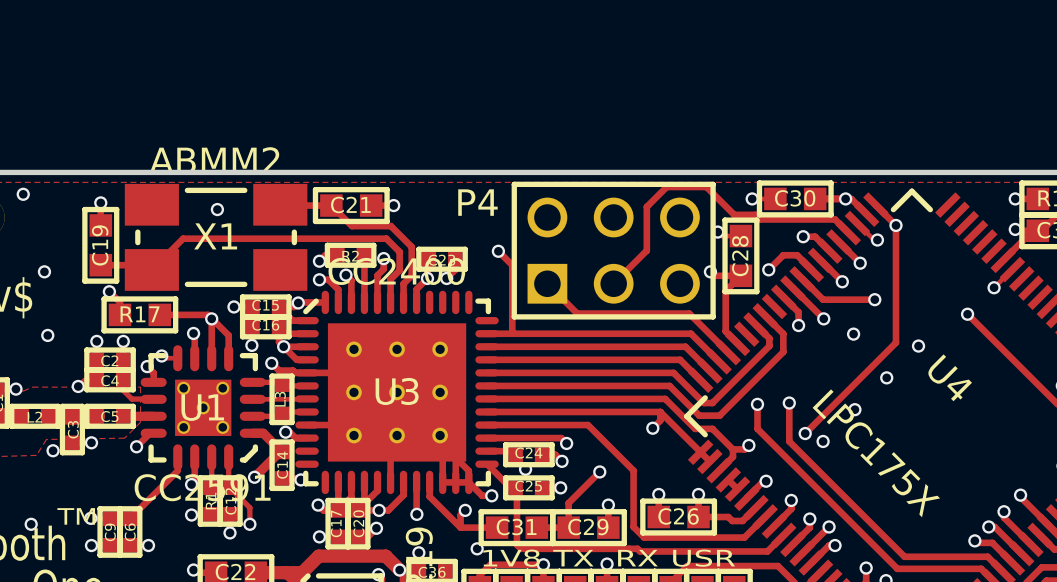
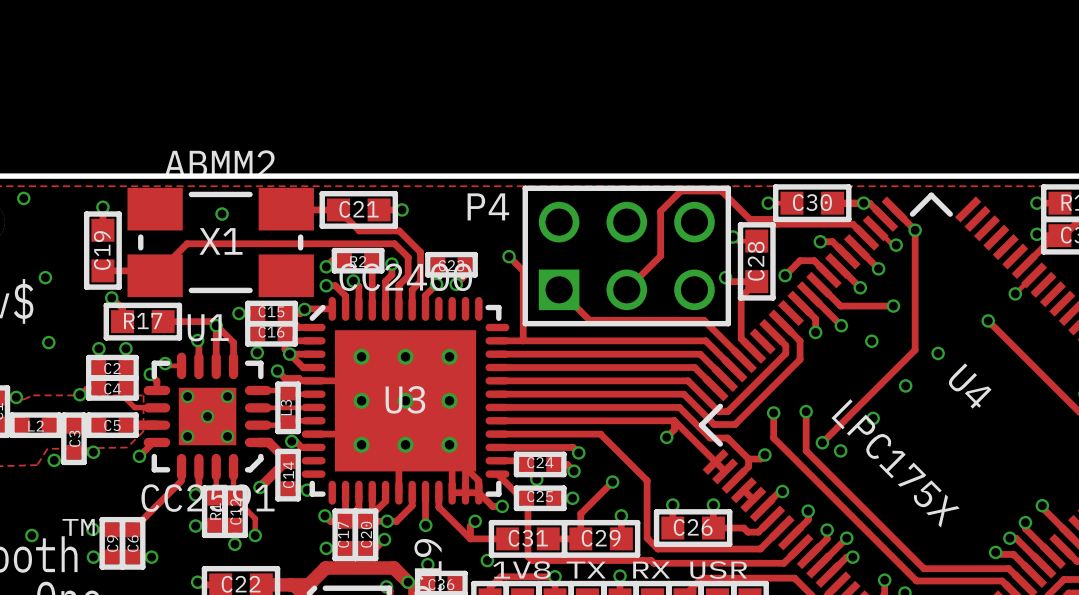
U1 name position: U1 (202, 407) -> U1 (208, 327)

